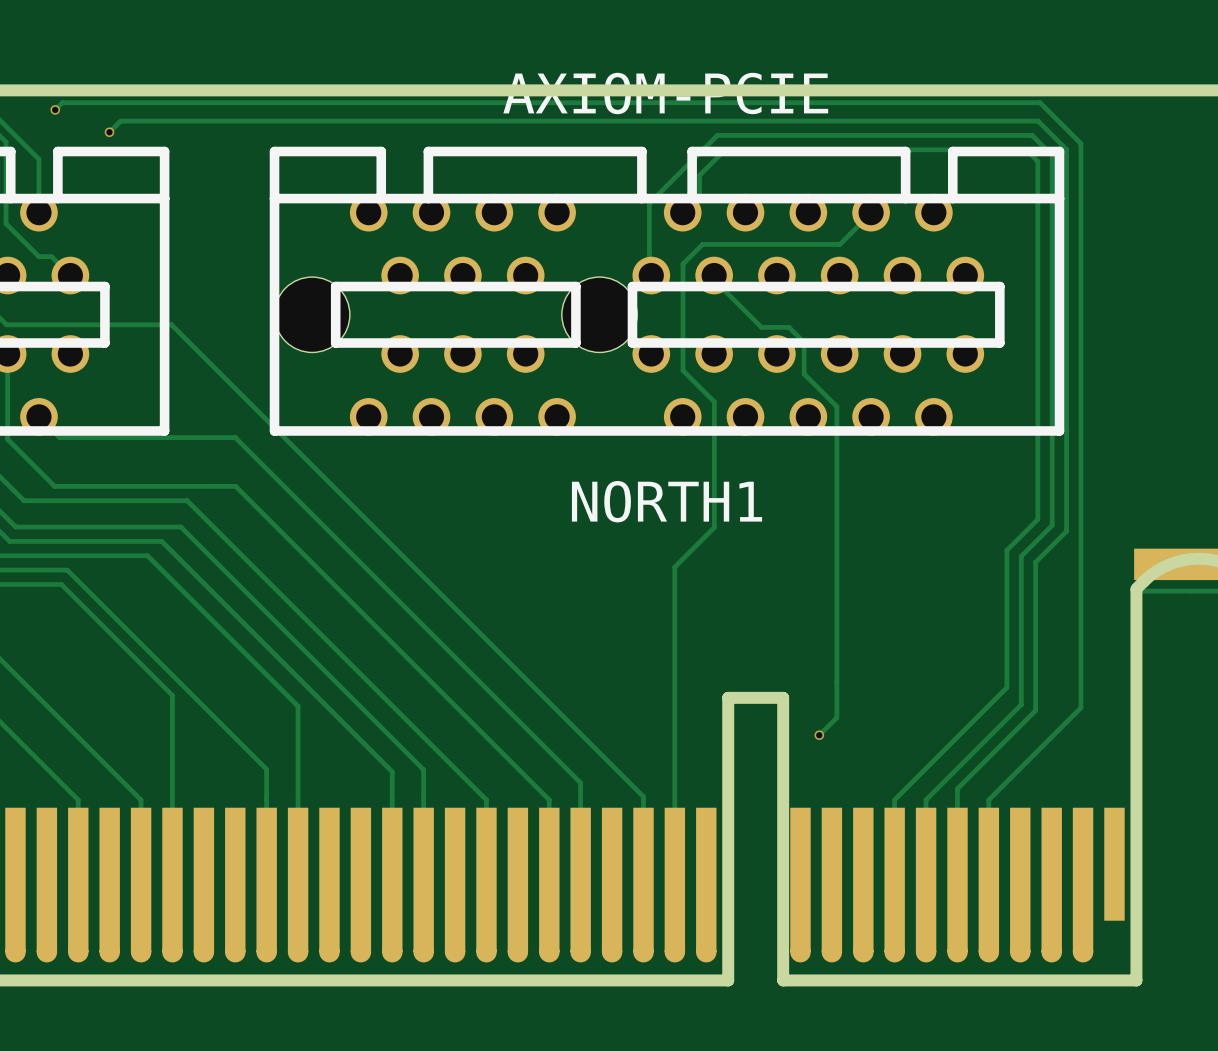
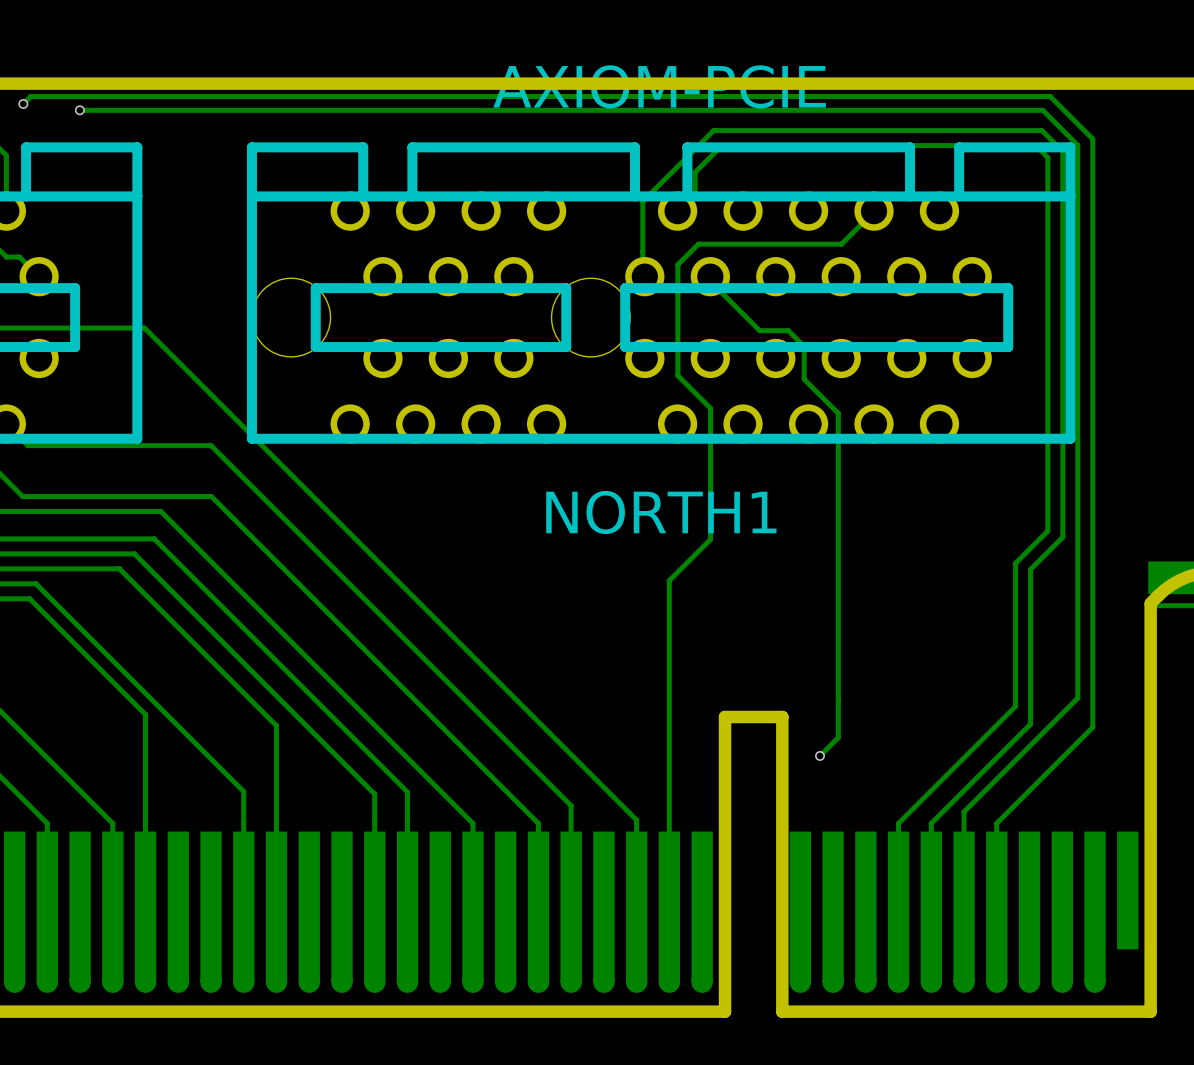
track: (1038, 121) (120, 121) (109, 132) -> (1048, 115) (1042, 110) (79, 110)
via position: (109, 132) -> (79, 110)
track: (1066, 531) (1035, 562) (1035, 710) -> (1077, 543) (1077, 698) (1045, 730)

